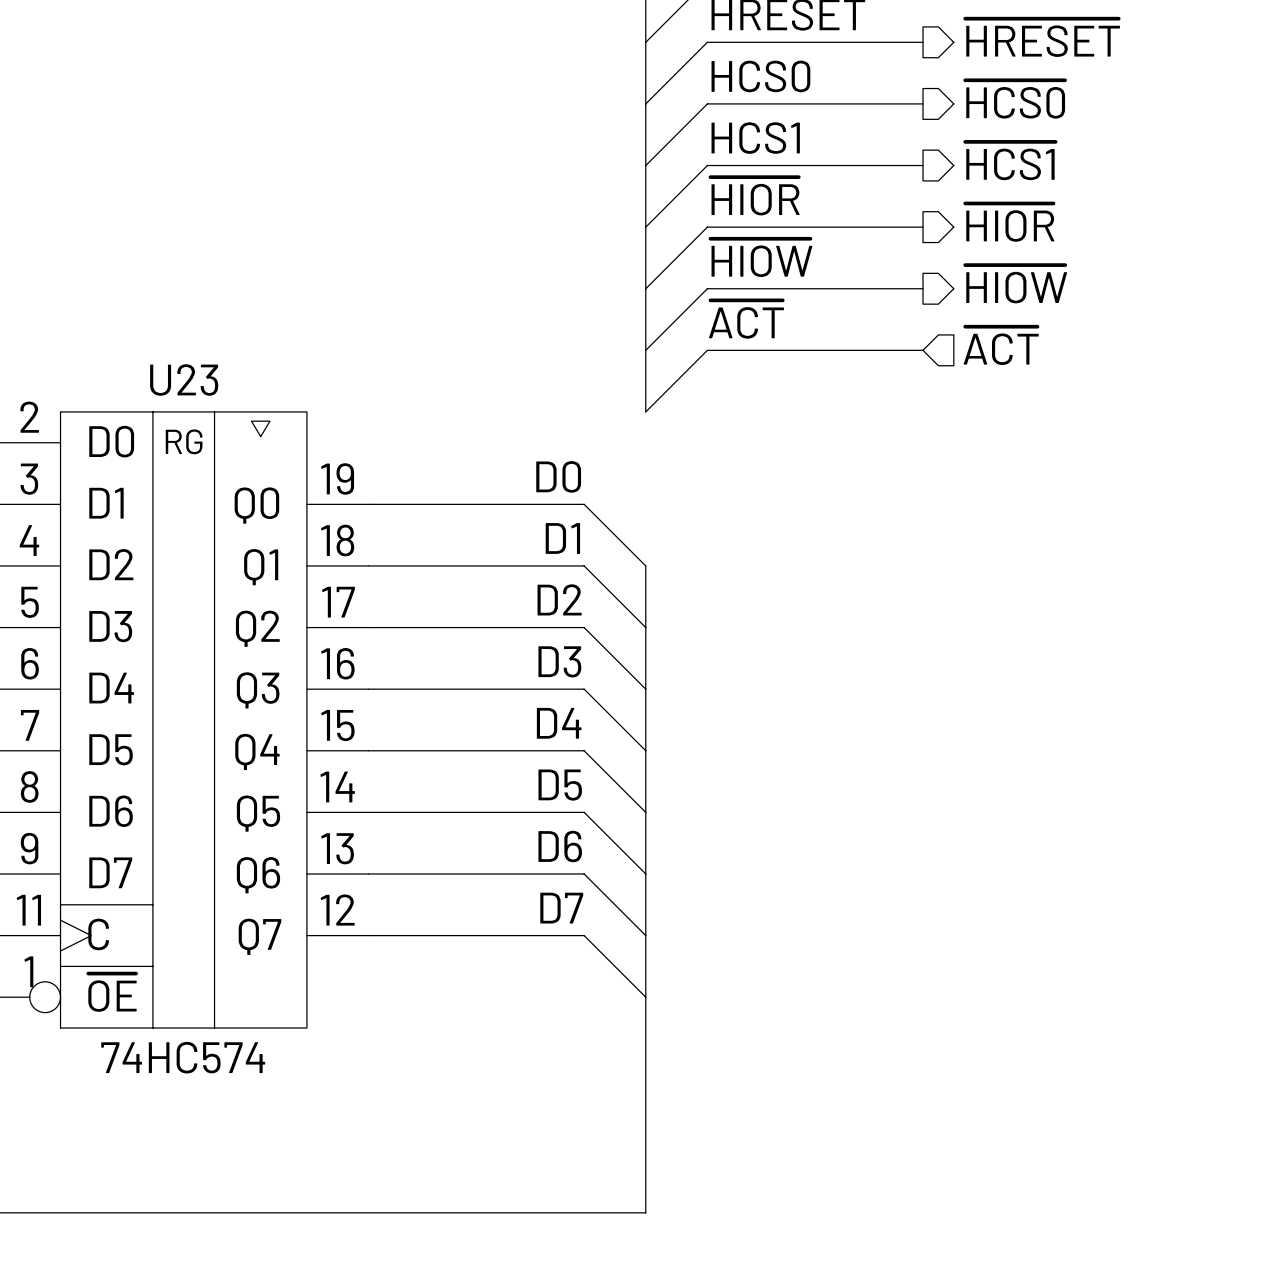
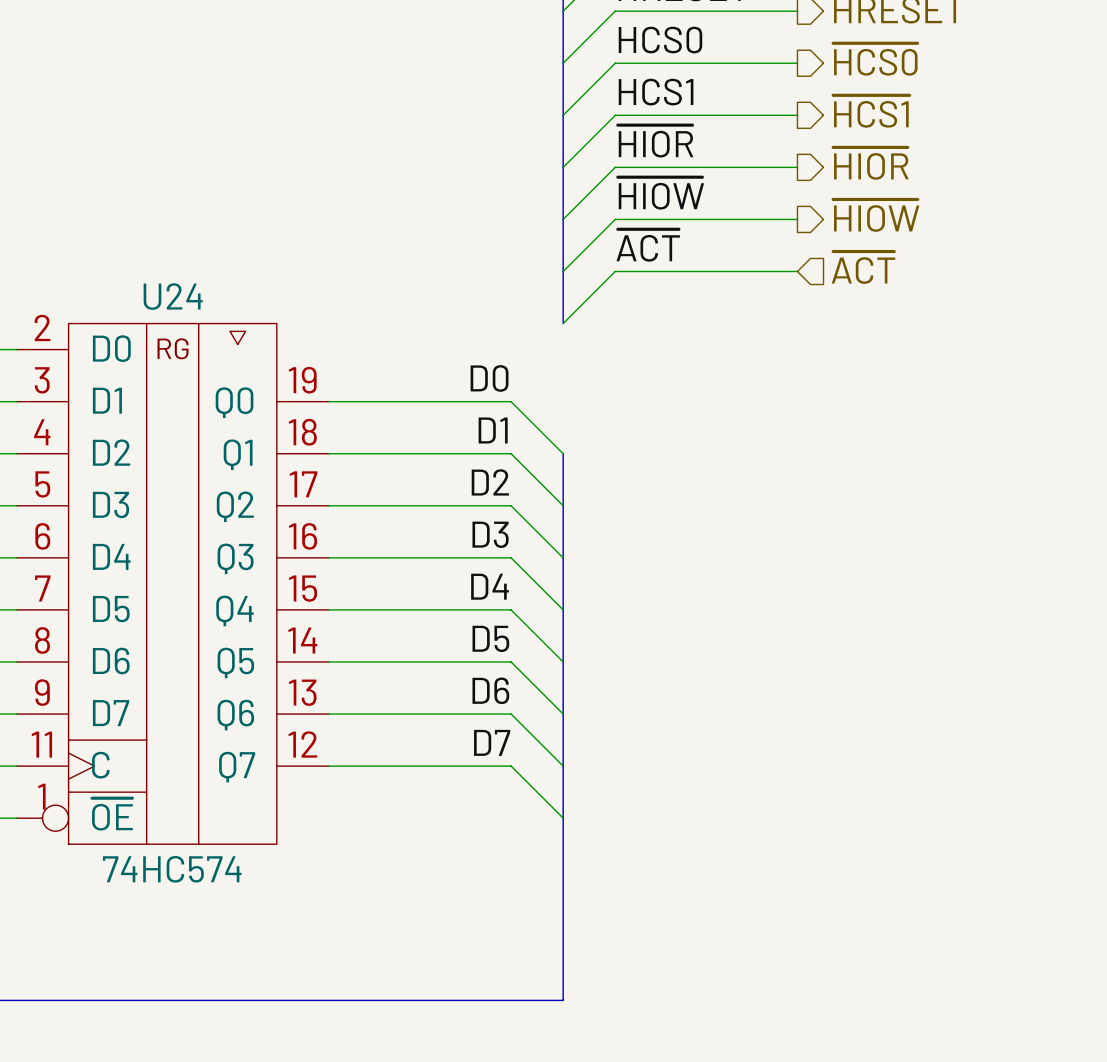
U23 name: U23 (184, 380) -> U24 (173, 296)

